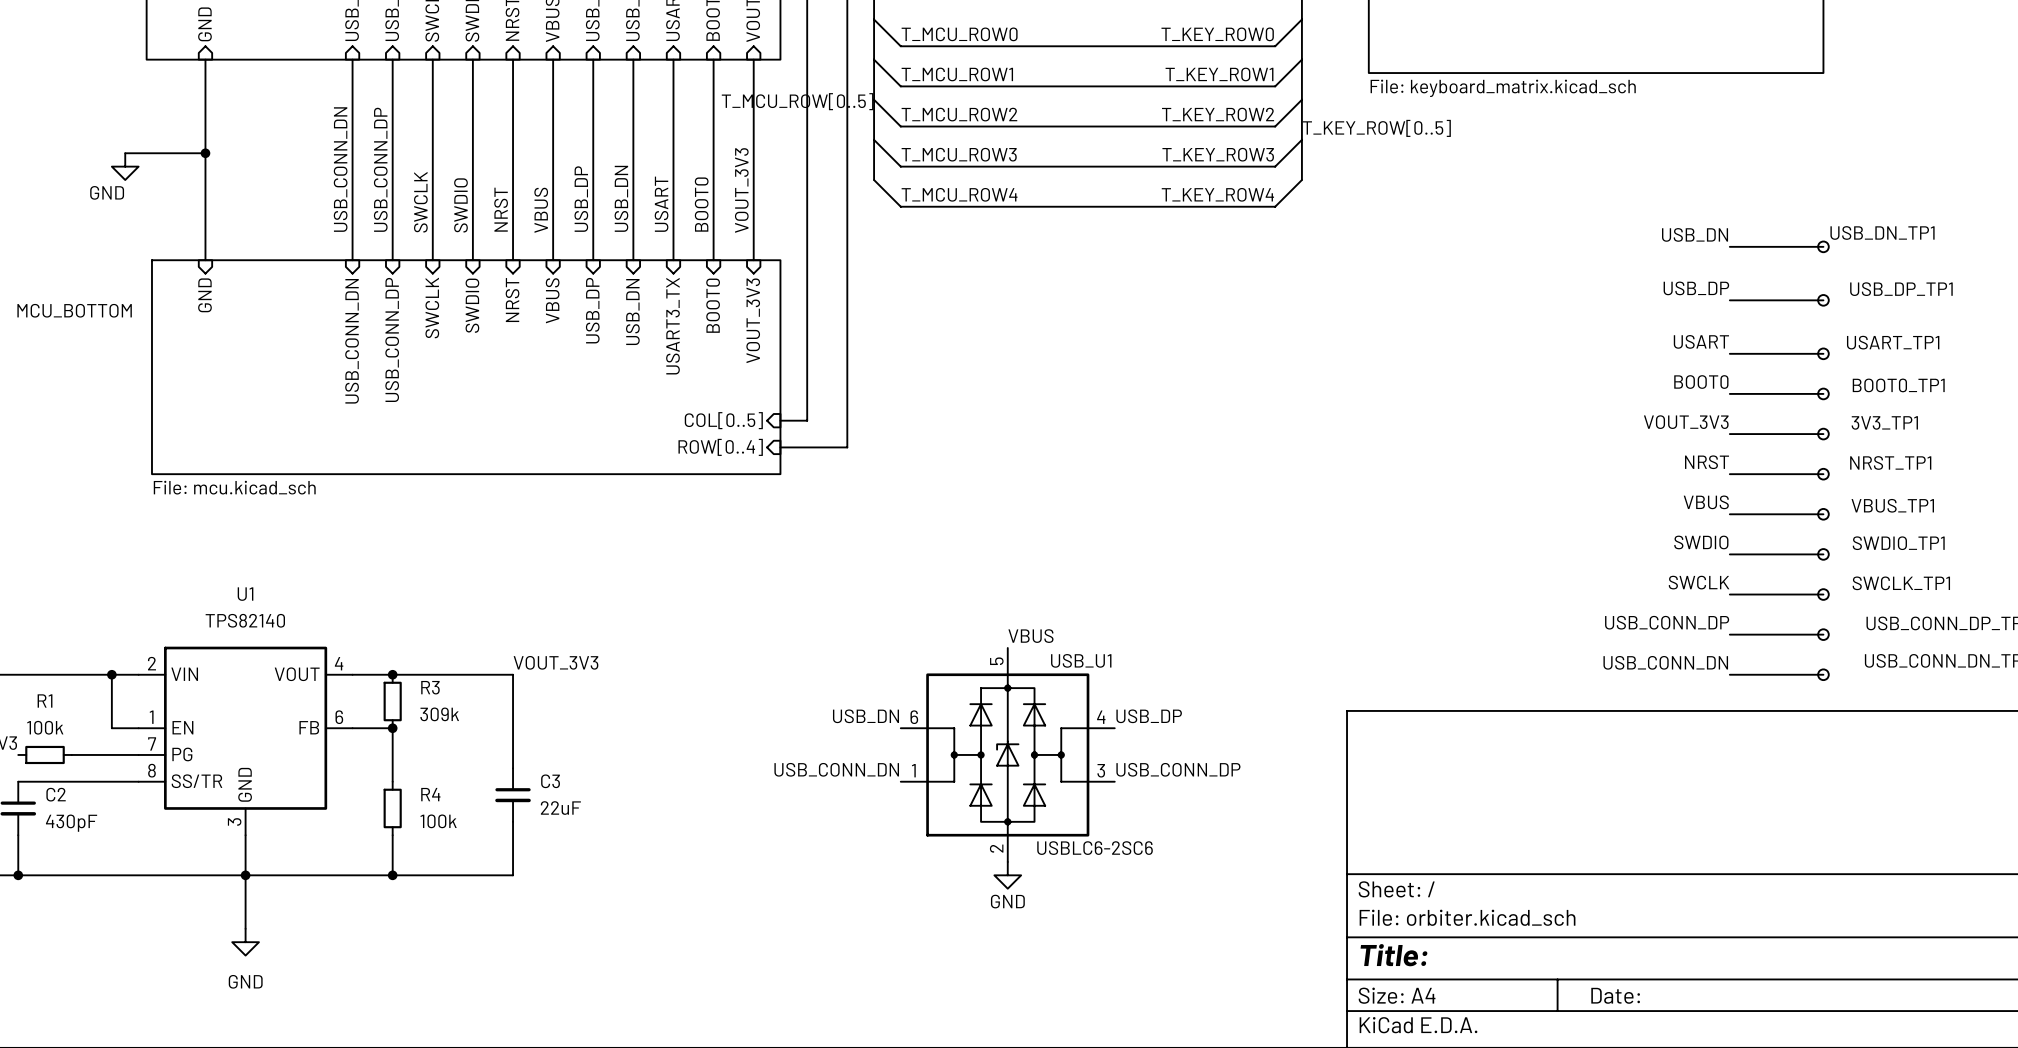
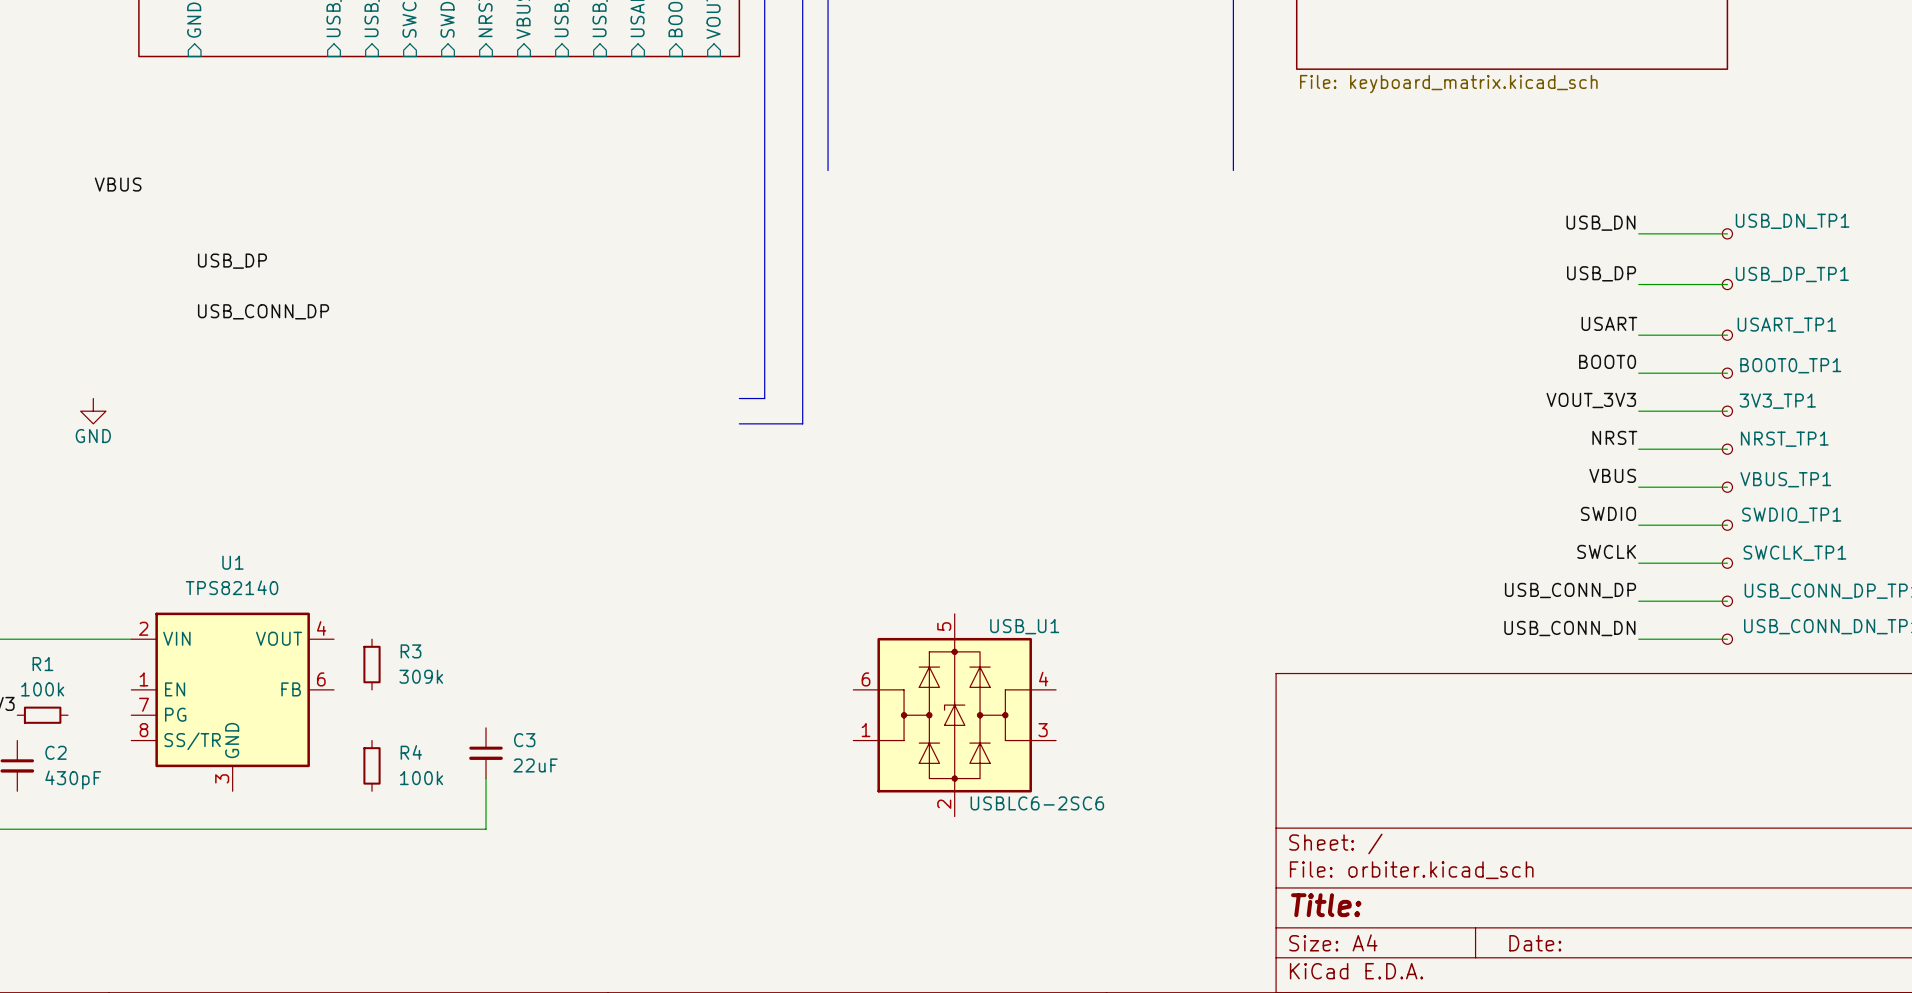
wire: (874, 19) (900, 46) (1275, 46) (1301, 19) -> none
label: T_MCU_ROW0 (959, 34) -> none
label: T_KEY_ROW0 (1217, 34) -> none
wire: (205, 59) (205, 260) -> none
wire: (352, 59) (352, 260) -> none
wire: (392, 59) (392, 260) -> none
wire: (432, 59) (432, 260) -> none
wire: (472, 59) (472, 260) -> none
wire: (513, 59) (513, 260) -> none
wire: (553, 59) (553, 260) -> none
wire: (593, 59) (593, 260) -> none
wire: (633, 59) (633, 260) -> none
wire: (673, 59) (673, 260) -> none
wire: (713, 59) (713, 260) -> none
wire: (753, 59) (753, 260) -> none
wire: (874, 59) (900, 86) (1275, 86) (1301, 59) -> none
label: T_MCU_ROW1 (957, 74) -> none
label: T_KEY_ROW1 (1219, 74) -> none
wire: (874, 99) (900, 126) (1275, 126) (1301, 99) -> none
label: T_MCU_ROW[0..5] (797, 101) -> none
label: T_MCU_ROW2 (959, 114) -> none
label: T_KEY_ROW2 (1218, 114) -> none
label: T_KEY_ROW[0..5] (1376, 128) -> none
wire: (874, 139) (900, 166) (1275, 166) (1301, 139) -> none
wire: (125, 153) (205, 153) -> none
junction: (205, 153) -> none
label: T_MCU_ROW3 (959, 154) -> none
label: T_KEY_ROW3 (1218, 154) -> none
power symbol: GND (125, 166) -> none
label: USB_CONN_DN (340, 169) -> none
label rotation: 0° (380, 169) -> 90° clockwise (263, 311)
label position: USB_CONN_DP (380, 169) -> USB_CONN_DP (263, 311)
wire: (874, 180) (900, 206) (1275, 206) (1301, 180) -> none
label: VOUT_3V3 (741, 190) -> none
label: none -> VBUS (118, 184)
label: T_MCU_ROW4 (959, 194) -> none
label: T_KEY_ROW4 (1217, 194) -> none
label: USB_DN (621, 198) -> none
label: USB_DP (581, 199) -> none
label: SWCLK (420, 202) -> none
label: USART (661, 204) -> none
label: BOOT0 (701, 204) -> none
label: SWDIO (460, 205) -> none
label: NRST (501, 209) -> none
label: VBUS (541, 210) -> none
label: none -> USB_DP (232, 261)
sheet pin: GND (204, 295) -> none
sheet pin: NRST (512, 300) -> none
sheet pin: VBUS (552, 300) -> none
sheet pin: SWDIO (472, 305) -> none
sheet pin: BOOT0 (713, 305) -> none
sheet pin: SWCLK (432, 307) -> none
sheet pin: USB_DP (592, 310) -> none
sheet pin: USB_DN (632, 312) -> none
sheet pin: VOUT_3V3 (753, 320) -> none
sheet pin: USART3_TX (672, 326) -> none
sheet pin: USB_CONN_DP (392, 339) -> none
sheet pin: USB_CONN_DN (352, 341) -> none
sheet MCU_BOTTOM: File: mcu.kicad_sch (466, 367) -> none
sheet pin: COL[0..5] (723, 420) -> none
power symbol: none -> GND (93, 411)
sheet pin: ROW[0..4] (720, 447) -> none
label: VBUS (1030, 636) -> none
label: VOUT_3V3 (556, 662) -> none
wire: (111, 674) (111, 728) (138, 728) -> none
junction: (111, 674) -> none
wire: (352, 674) (513, 674) (513, 768) -> none
junction: (392, 674) -> none
label: USB_DN (865, 716) -> none
label: USB_DP (1149, 716) -> none
wire: (352, 728) (392, 728) (392, 781) -> none
junction: (392, 728) -> none
wire: (71, 754) (138, 754) -> none
label: USB_CONN_DN (836, 769) -> none
label: USB_CONN_DP (1178, 769) -> none
wire: (18, 781) (138, 781) -> none
wire: (18, 835) (18, 875) -> none
wire: (245, 835) (245, 928) -> none
wire: (392, 835) (392, 875) -> none
junction: (18, 875) -> none
junction: (245, 875) -> none
junction: (392, 875) -> none
power symbol: GND (1007, 875) -> none
power symbol: GND (245, 942) -> none

